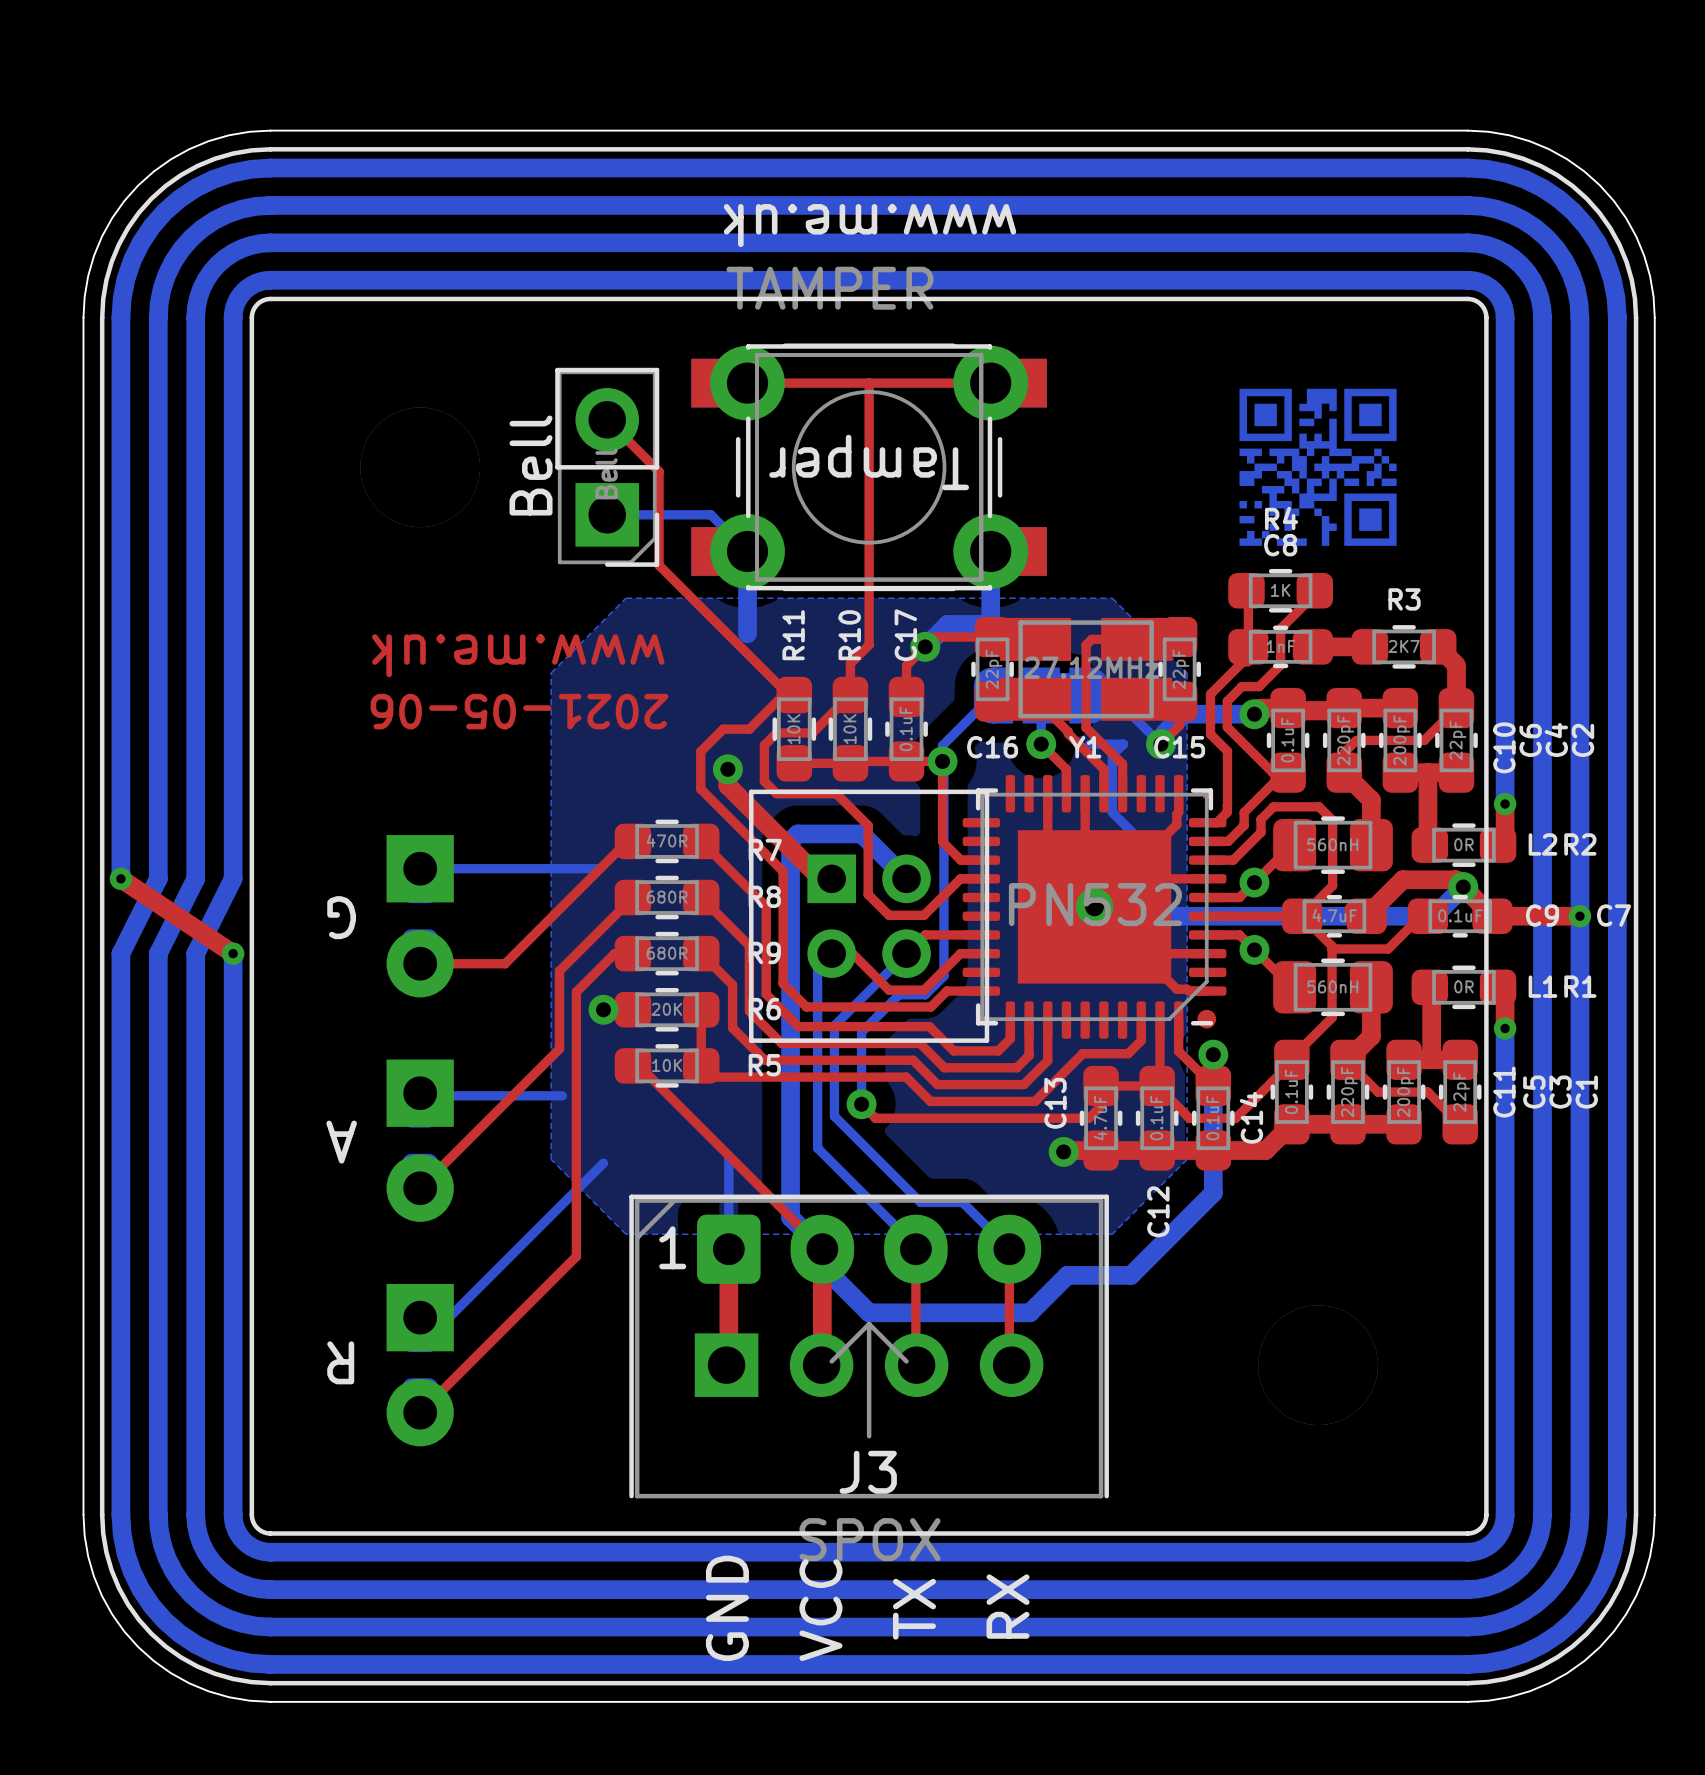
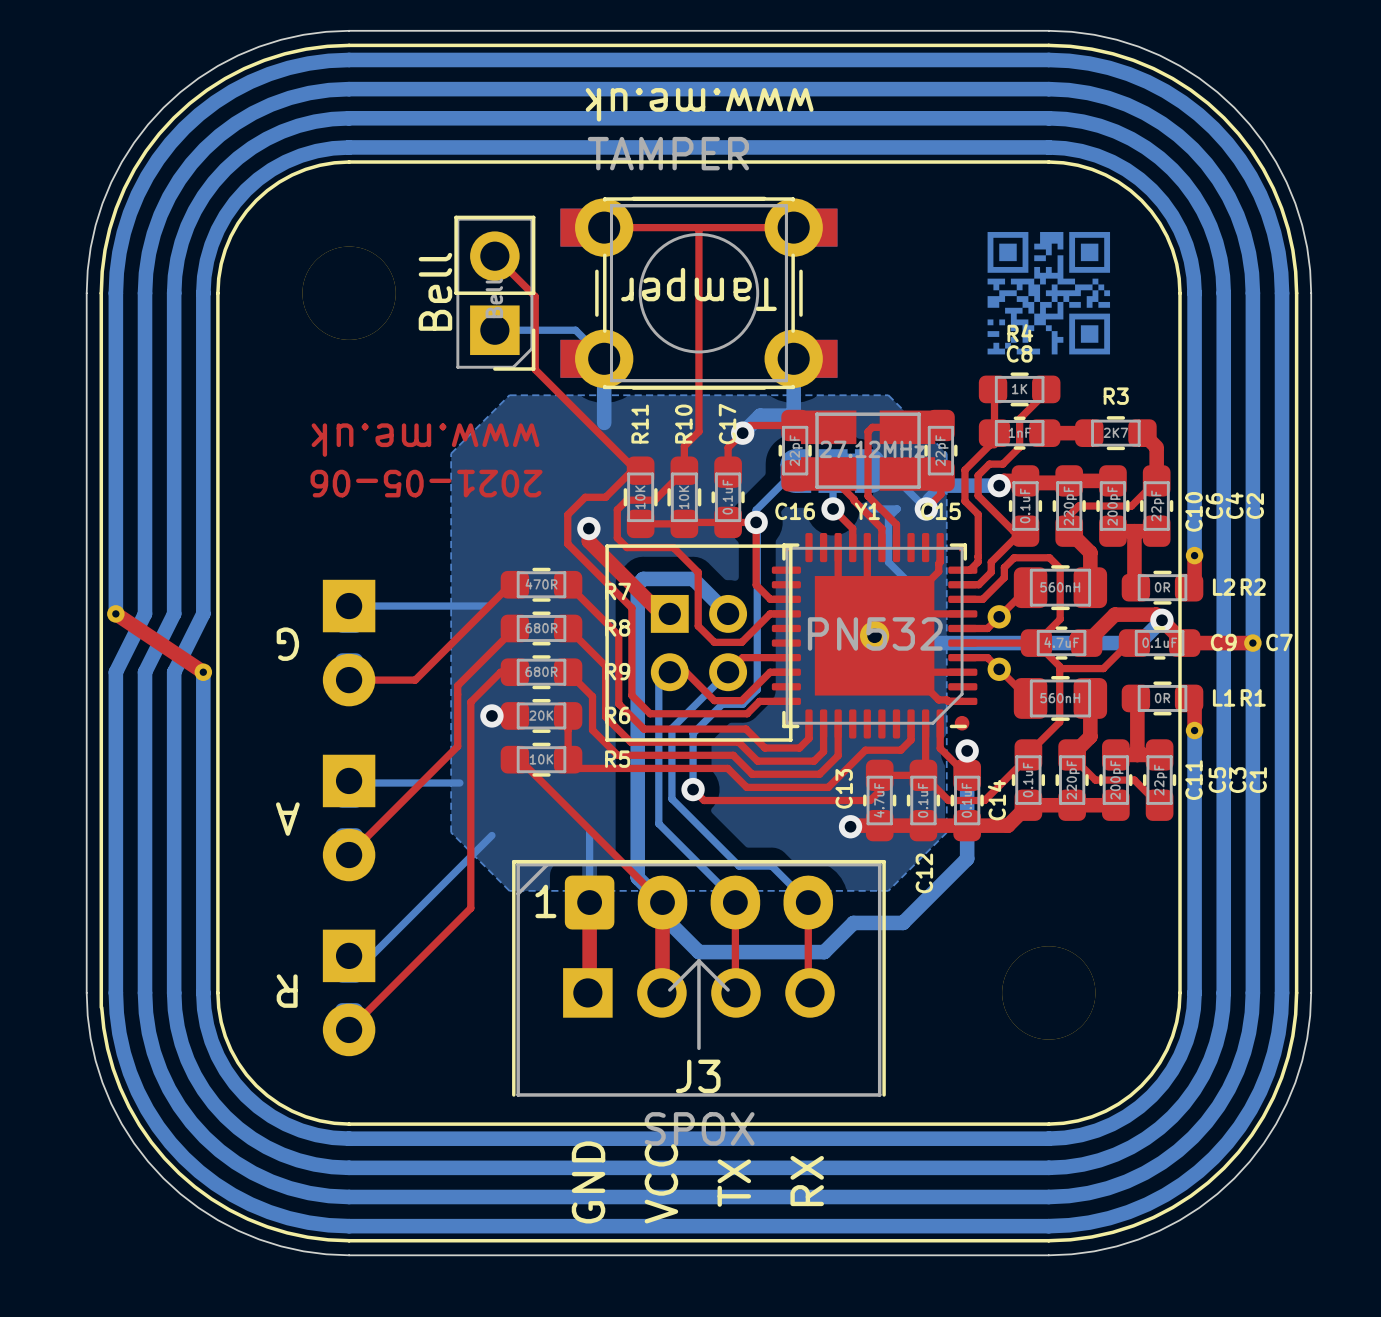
board edge: (420, 130) (270, 130) (228, 135) (208, 141) (171, 159) (138, 185) (112, 218) (102, 236) (88, 276) (83, 317) (83, 467) -> (349, 30) (303, 34) (259, 46) (217, 65) (180, 92) (163, 107) (134, 142) (111, 182) (95, 225) (90, 247) (86, 293)
board edge: (1318, 130) (1467, 130) (1509, 135) (1529, 141) (1567, 159) (1599, 185) (1626, 218) (1636, 236) (1650, 276) (1654, 317) (1654, 467) -> (1048, 30) (1094, 34) (1138, 46) (1180, 65) (1217, 92) (1234, 107) (1263, 142) (1286, 182) (1302, 225) (1307, 247) (1311, 293)
part footprint: [99, 147, 1639, 1686] -> [99, 43, 1299, 1243]
board edge: (83, 1365) (83, 1514) (88, 1556) (102, 1595) (112, 1614) (138, 1647) (171, 1673) (208, 1691) (228, 1697) (270, 1701) (420, 1701) -> (86, 992) (90, 1038) (95, 1060) (111, 1103) (134, 1143) (163, 1178) (180, 1193) (217, 1220) (259, 1239) (303, 1251) (349, 1255)
board edge: (1654, 1365) (1654, 1514) (1650, 1556) (1636, 1595) (1626, 1614) (1599, 1647) (1567, 1673) (1529, 1691) (1509, 1697) (1467, 1701) (1318, 1701) -> (1311, 992) (1307, 1038) (1302, 1060) (1286, 1103) (1263, 1143) (1234, 1178) (1217, 1193) (1180, 1220) (1138, 1239) (1094, 1251) (1048, 1255)

